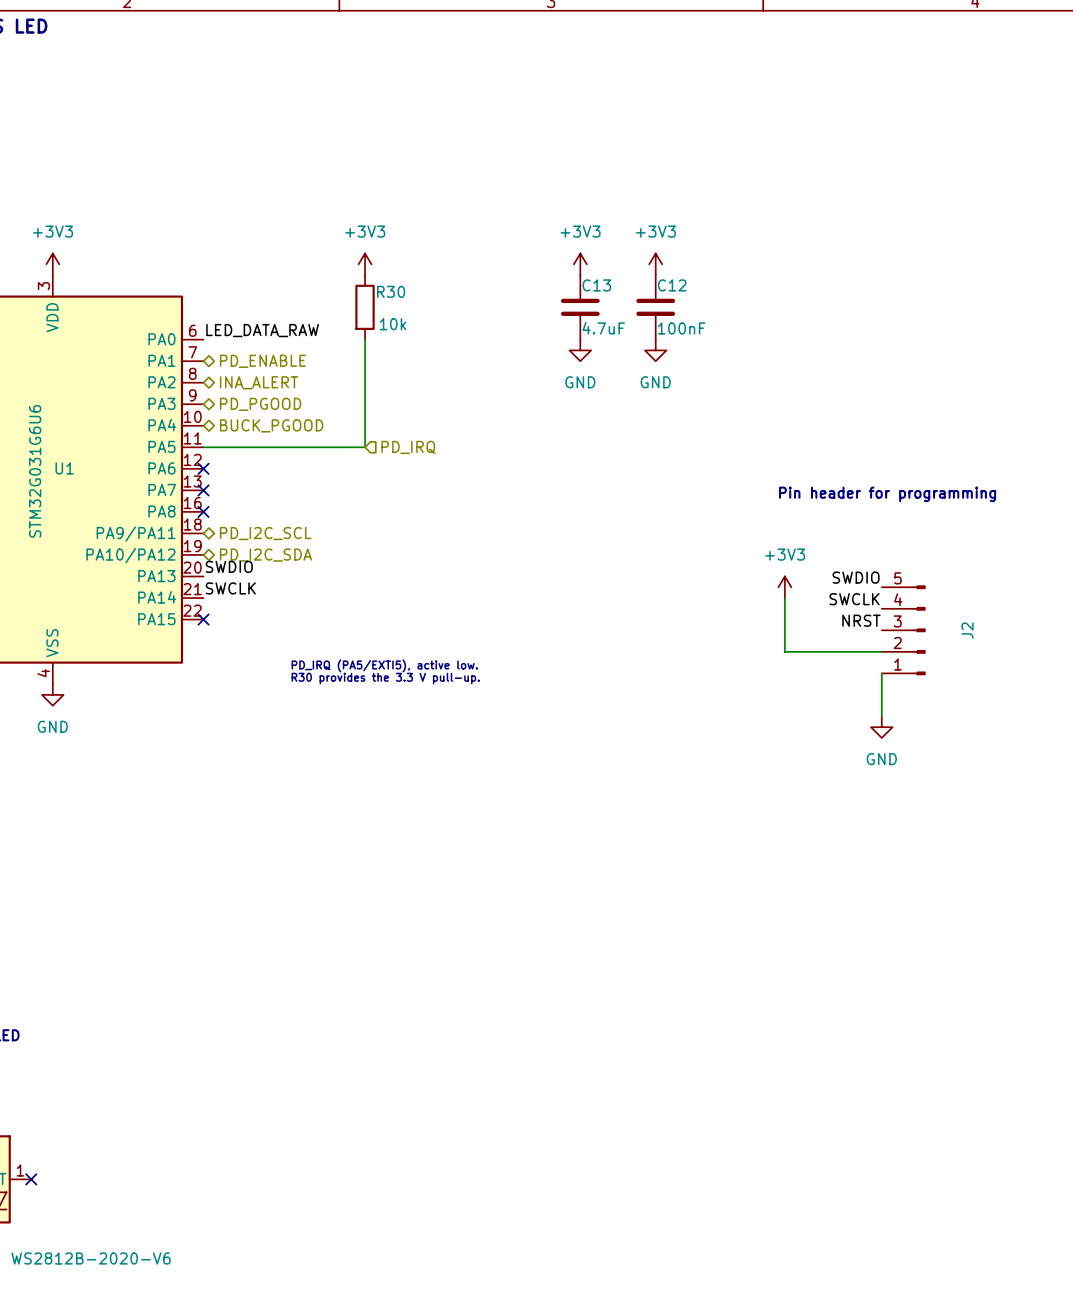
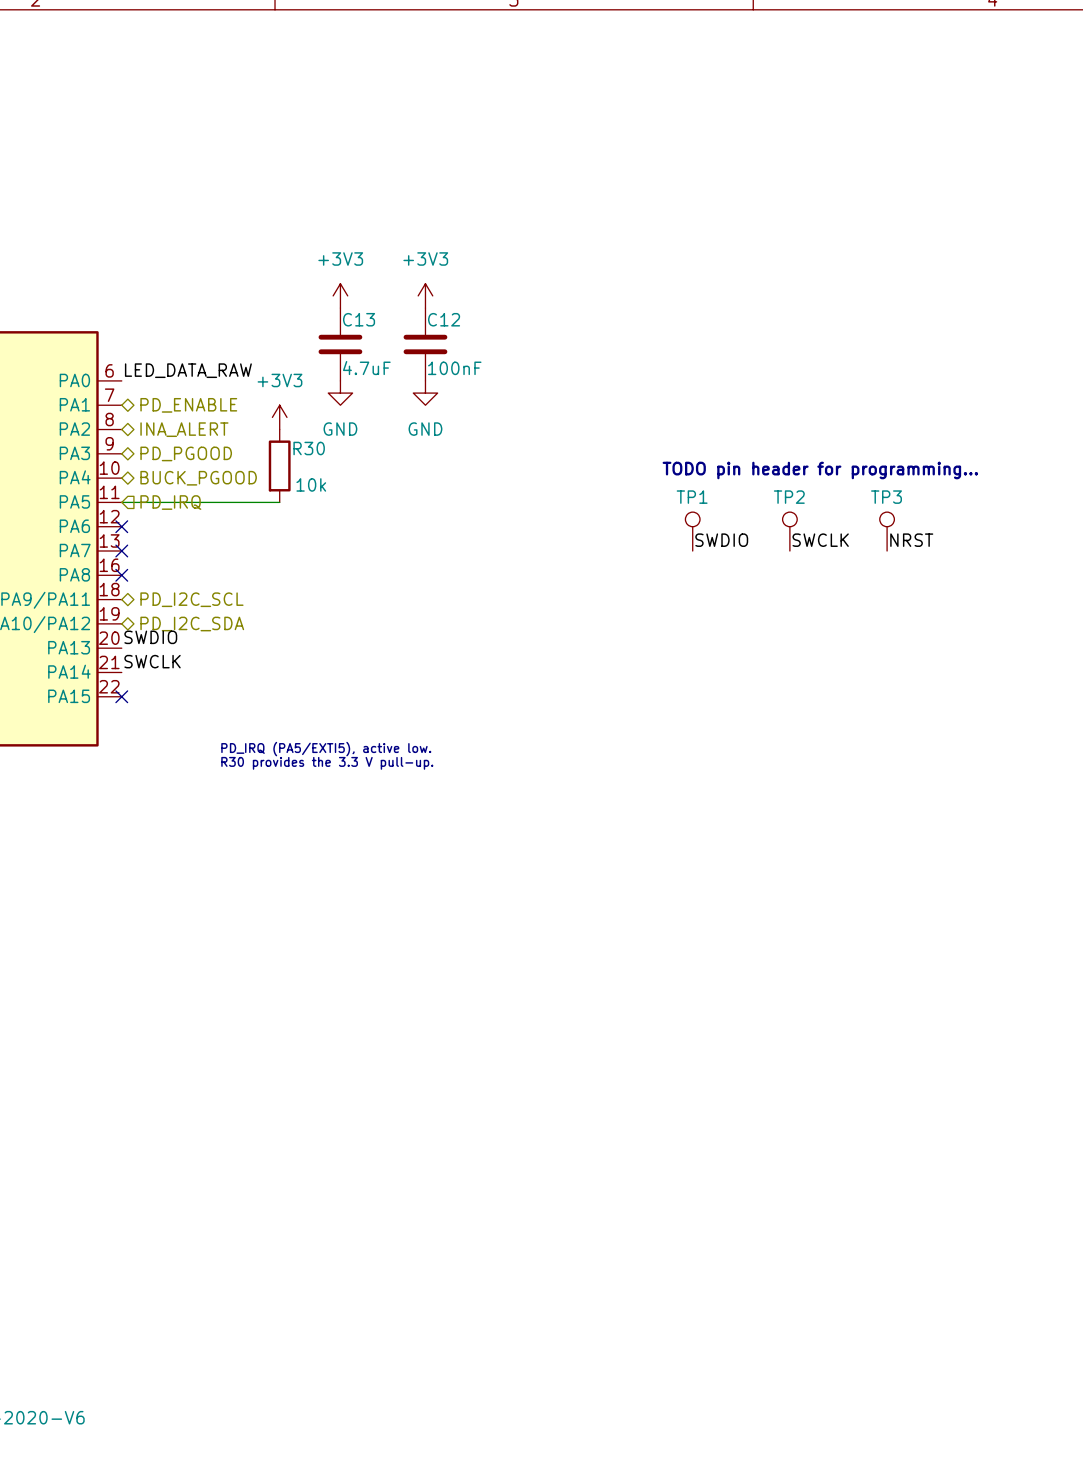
power symbol position: +3V3 (365, 264) -> +3V3 (340, 295)
power symbol: none -> +3V3 (425, 295)
power symbol: +3V3 (580, 264) -> none
power symbol: +3V3 (655, 264) -> none
R30 position: (365, 307) -> (279, 465)
C13 position: (580, 307) -> (340, 344)
C12 position: (655, 307) -> (425, 344)
wire: (365, 339) (365, 447) (343, 447) -> none
power symbol: none -> GND (340, 393)
power symbol: none -> GND (425, 393)
power symbol: GND (580, 350) -> none
power symbol: GND (655, 350) -> none
power symbol: none -> +3V3 (279, 417)
text: none -> TODO pin header for programming... (820, 470)
hierarchical label position: PD_IRQ (408, 447) -> PD_IRQ (170, 502)
TP1: none -> (692, 531)
TP2: none -> (789, 531)
TP3: none -> (887, 531)
text: Pin header for programming (887, 494) -> none
label position: SWDIO (856, 577) -> SWDIO (721, 540)
power symbol: +3V3 (784, 587) -> none
wire: (784, 598) (784, 651) (881, 651) -> none
label position: SWCLK (854, 599) -> SWCLK (820, 540)
label position: NRST (861, 620) -> NRST (911, 540)
J2: (903, 630) -> none
wire: (881, 673) (881, 716) -> none
power symbol: GND (881, 727) -> none

